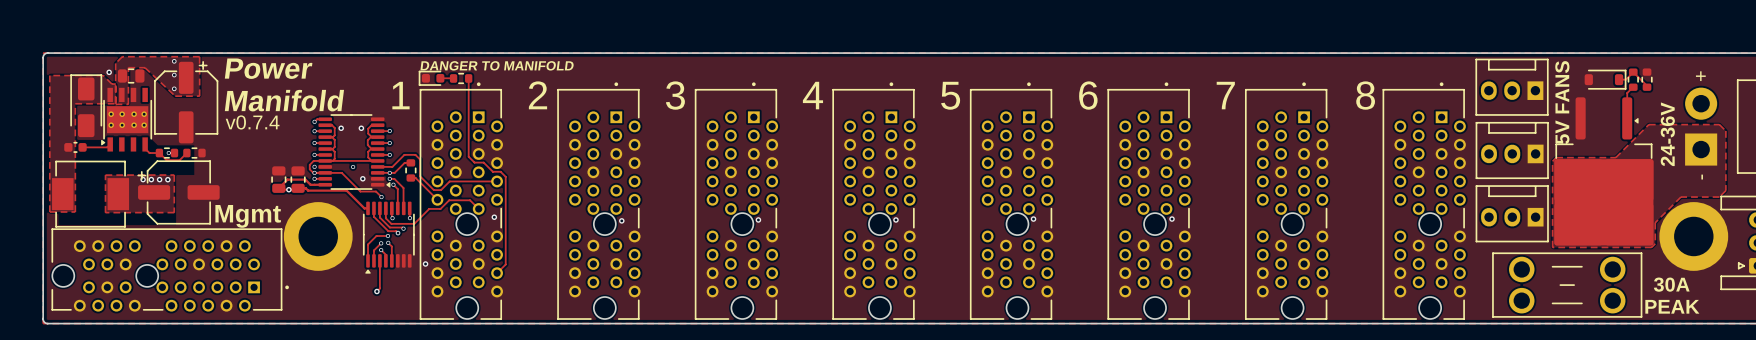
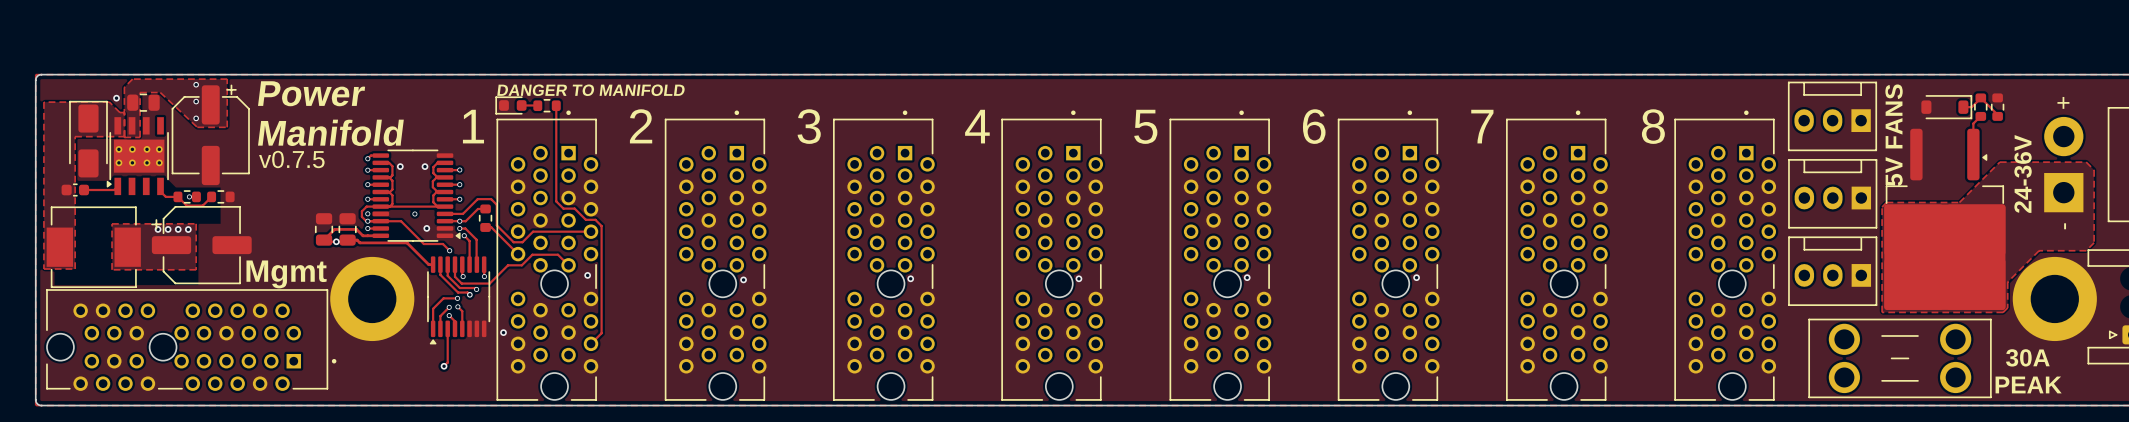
text: v0.7.4 (252, 122) -> v0.7.5 (291, 159)

